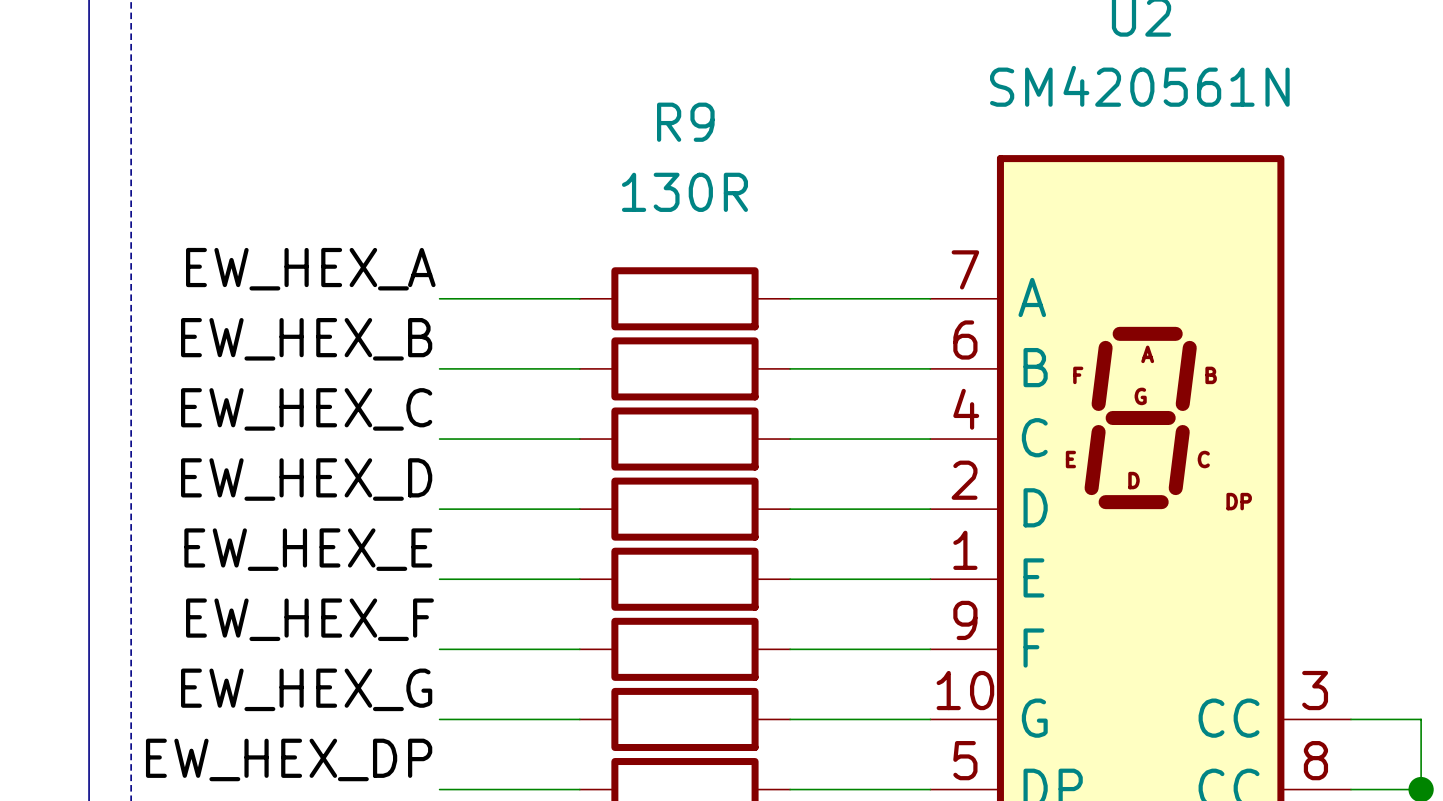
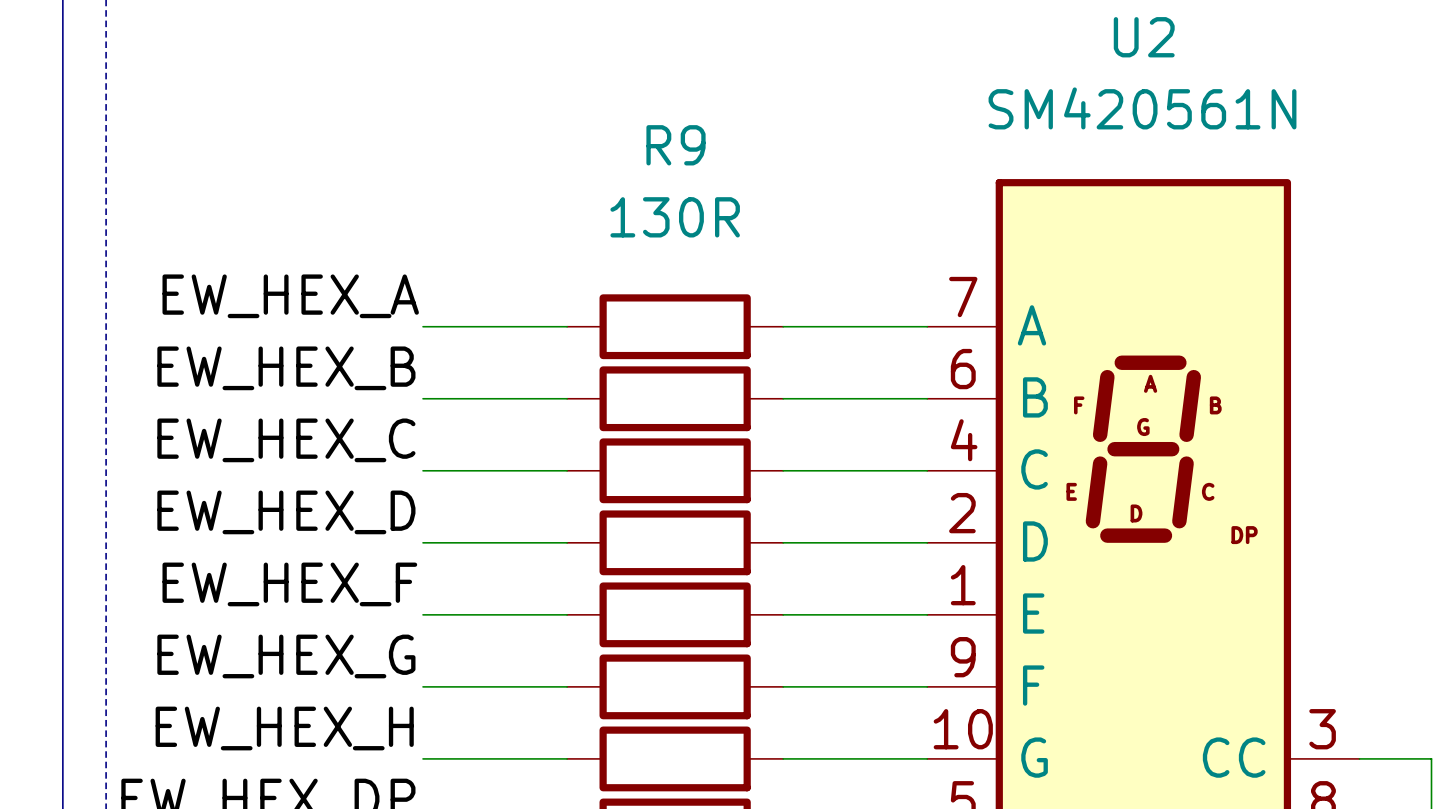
label: EW_HEX_E (308, 549) -> EW_HEX_F (289, 584)
label: EW_HEX_F (309, 619) -> EW_HEX_G (286, 656)
label: EW_HEX_G (306, 689) -> EW_HEX_H (284, 728)

